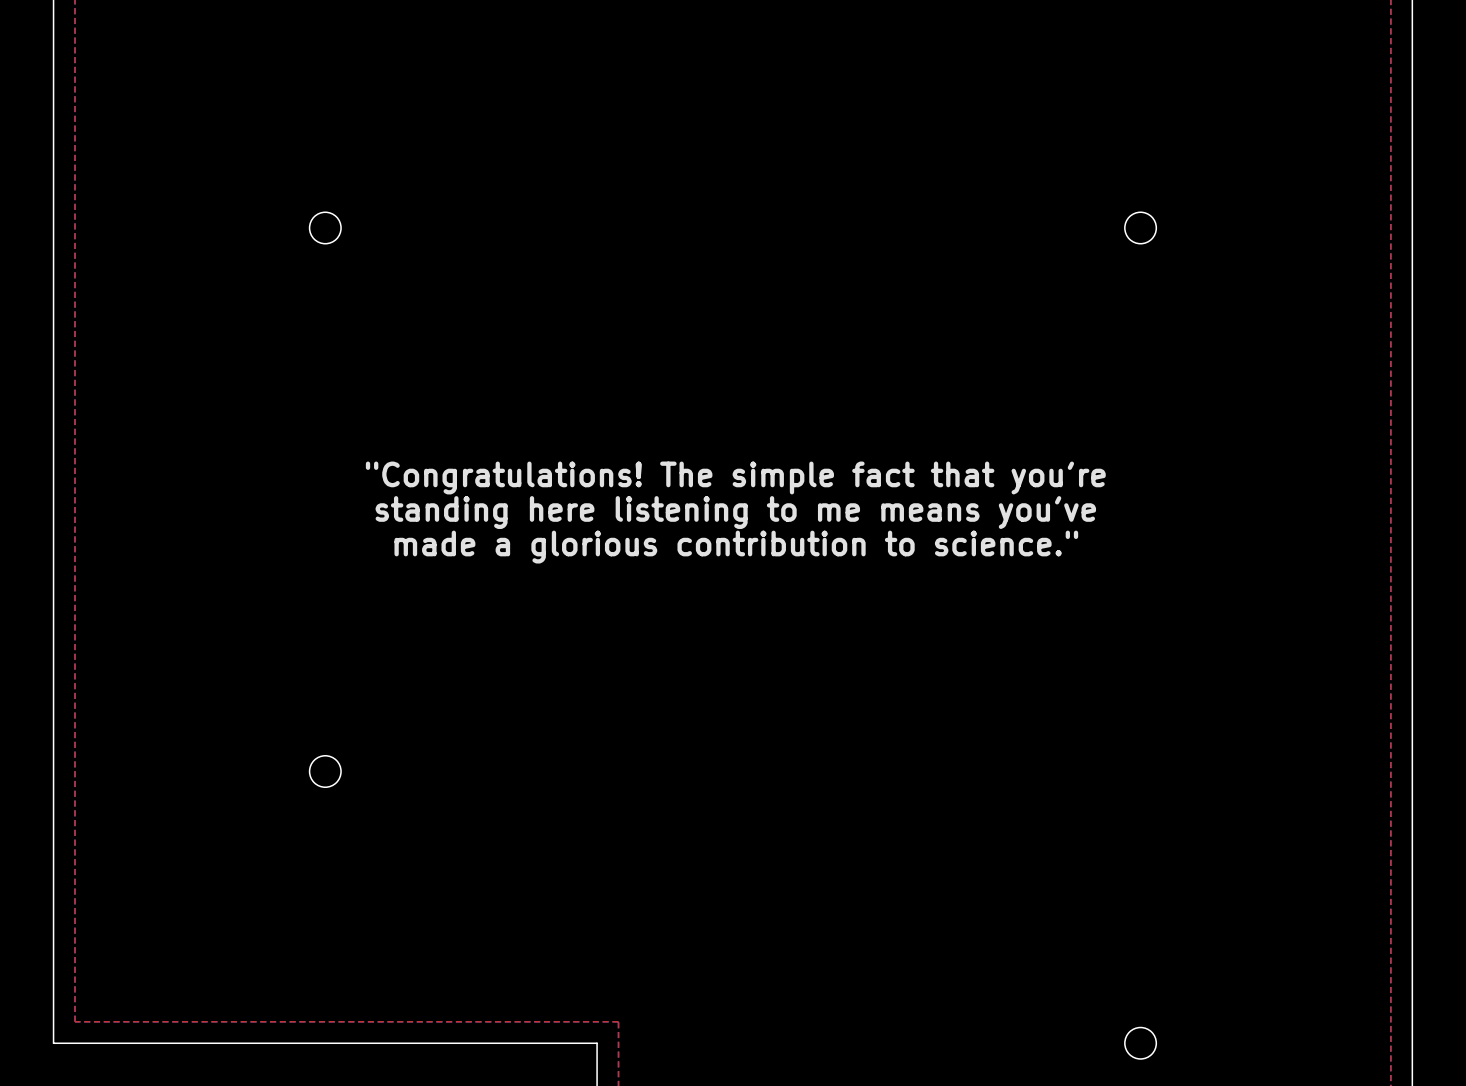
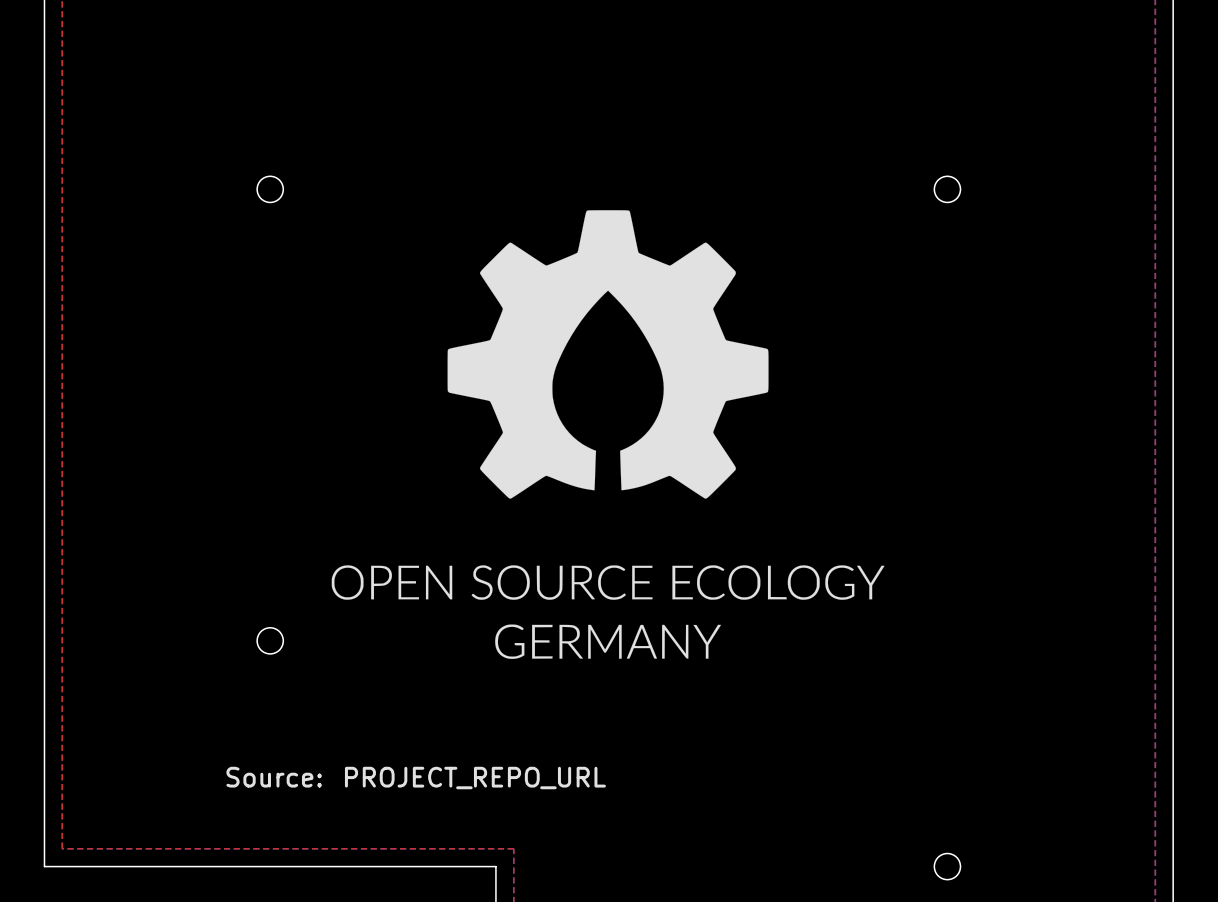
drawing: none -> [331, 210, 885, 659]
text: "Congratulations! The simple fact that you're (735, 477) -> none
text: standing here listening to me means you've (735, 512) -> none
text: made a glorious contribution to science." (736, 547) -> none
text: none -> Source: (274, 777)
text: none -> PROJECT_REPO_URL (475, 778)

